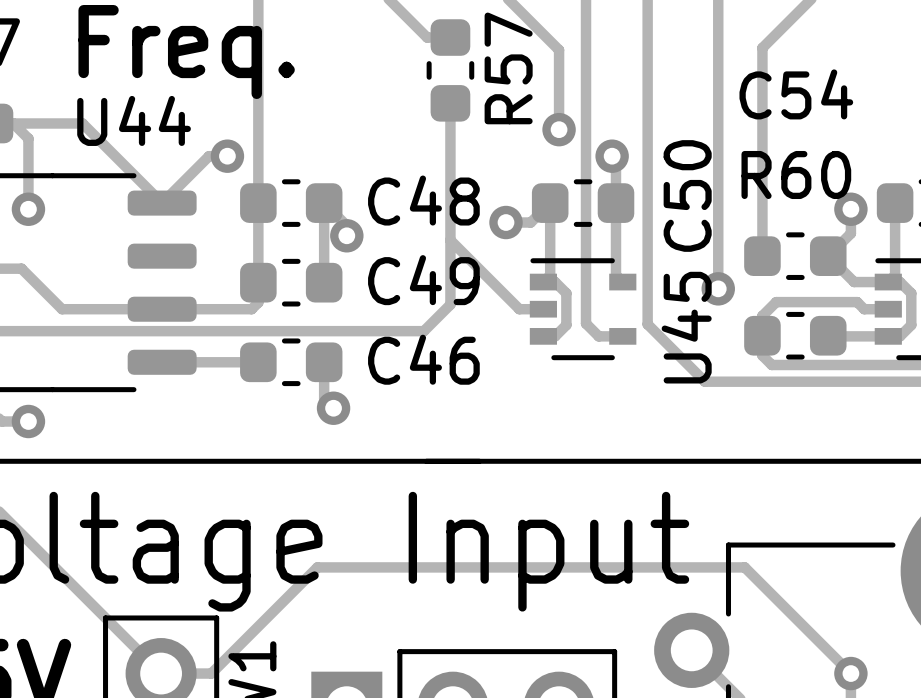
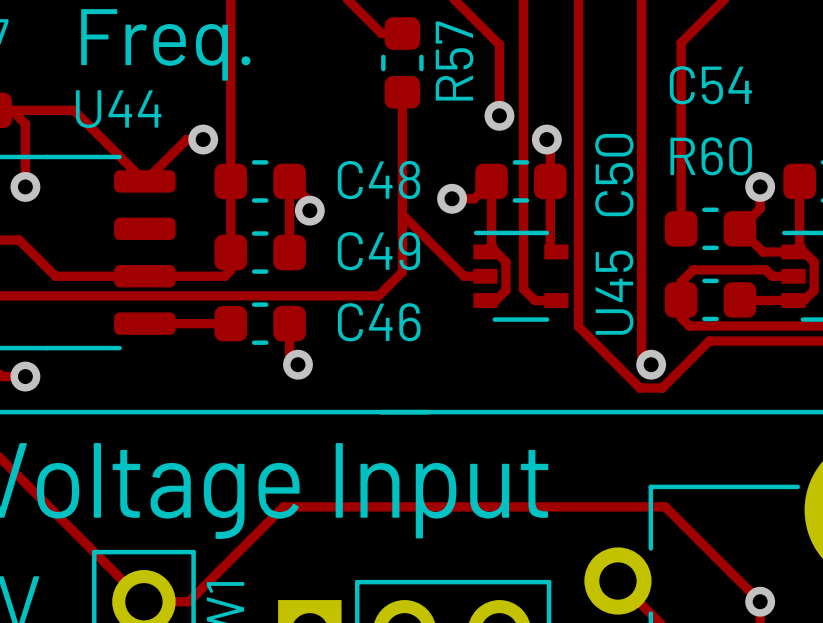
track: none -> (641, 258) (641, 355) (651, 364)
via position: (718, 288) -> (651, 364)
track: (647, 324) (704, 381) (794, 381) -> (578, 289) (578, 326) (639, 388) (662, 388) (709, 341)

